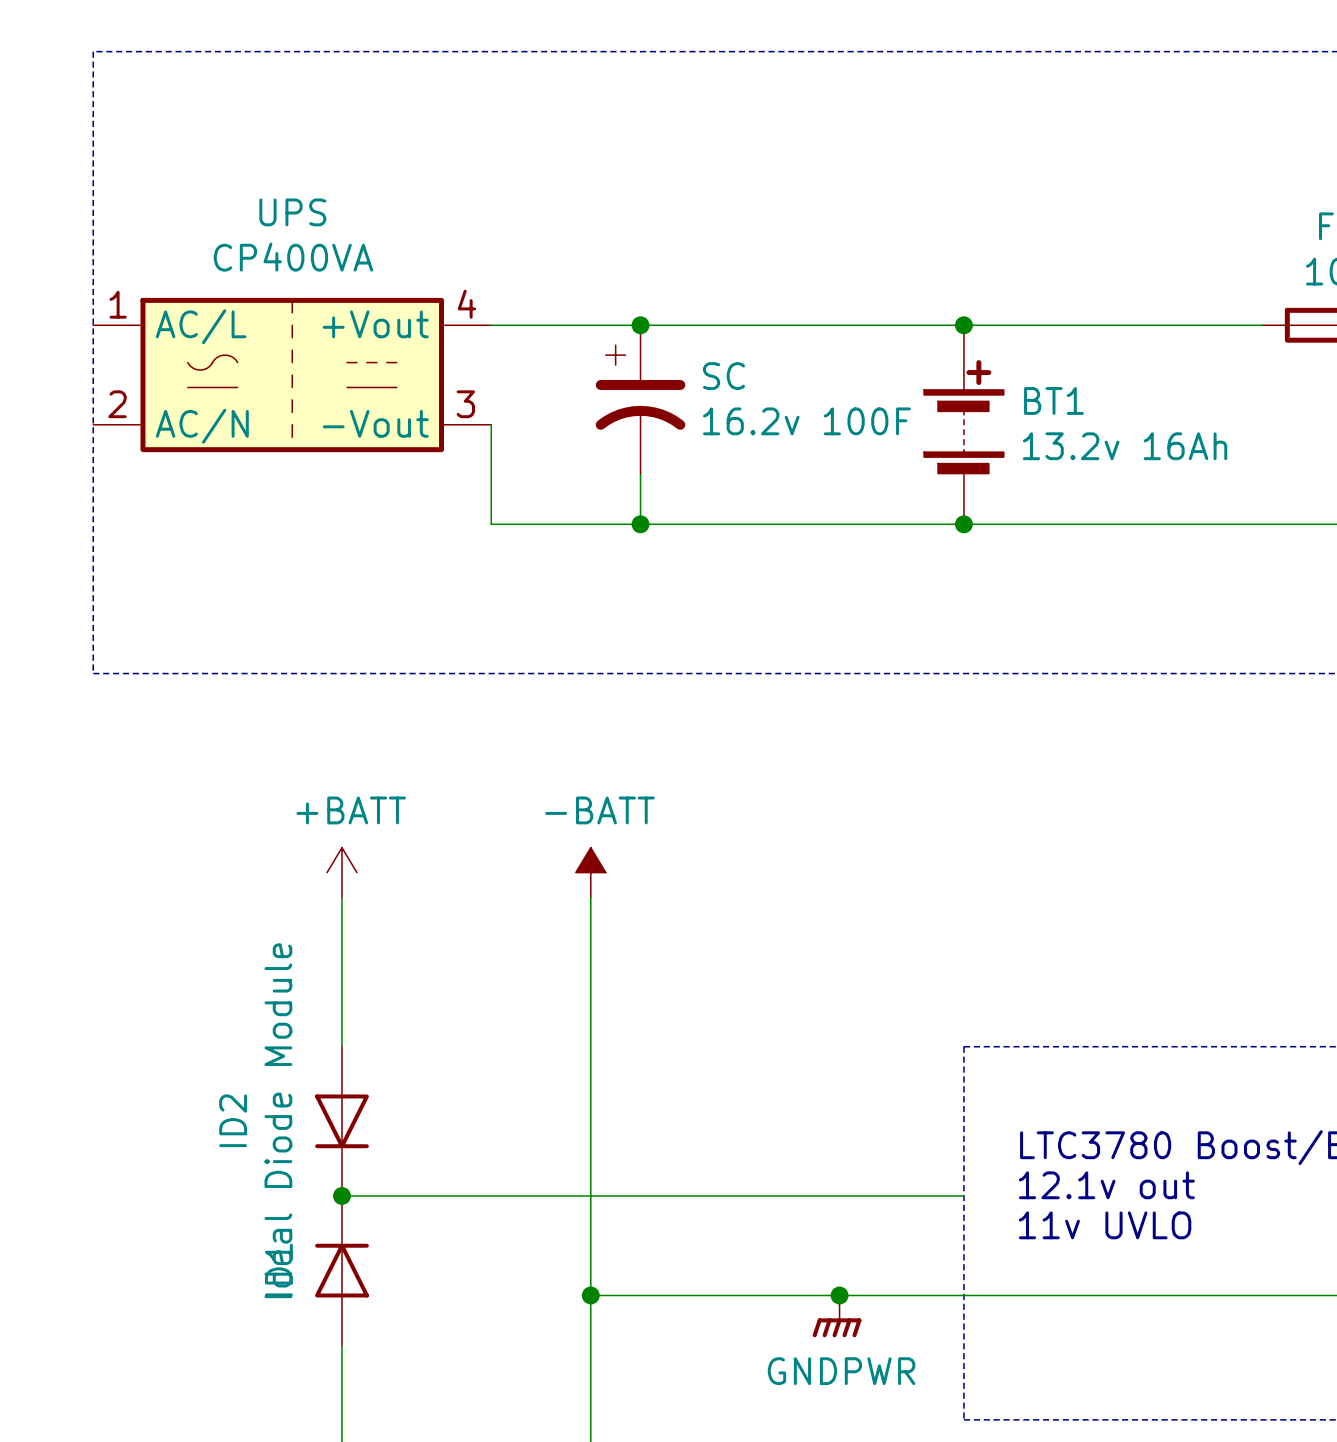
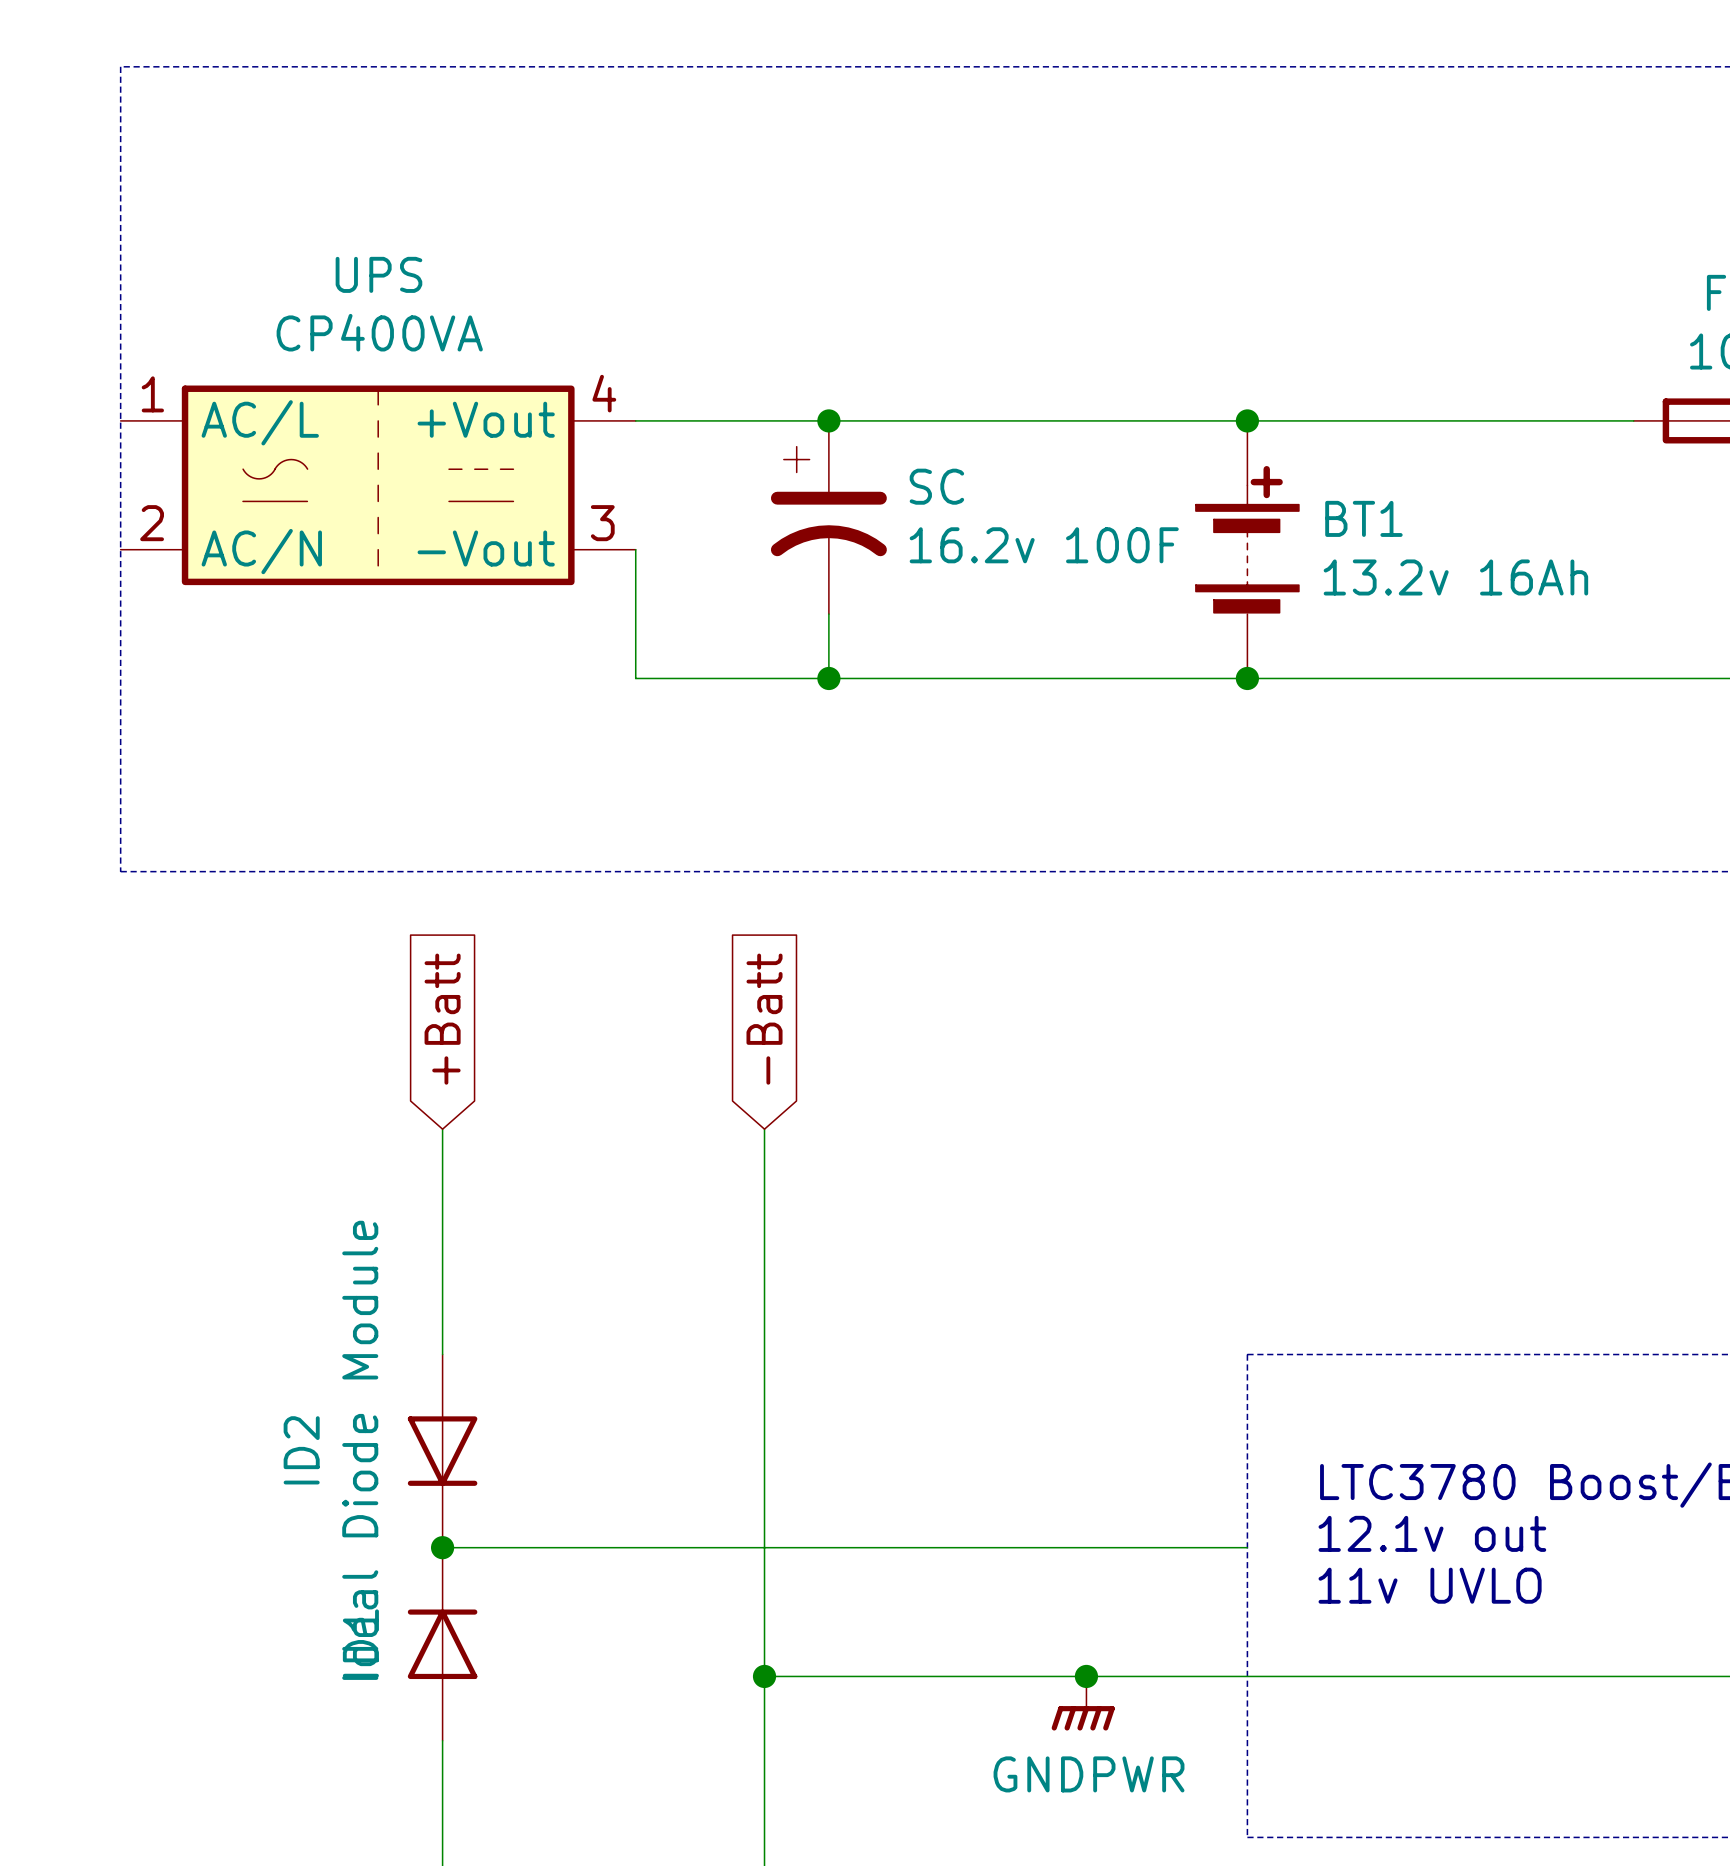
global label: none -> +Batt (442, 1019)
global label: none -> -Batt (764, 1019)
power symbol: +BATT (342, 872) -> none
power symbol: -BATT (590, 872) -> none

